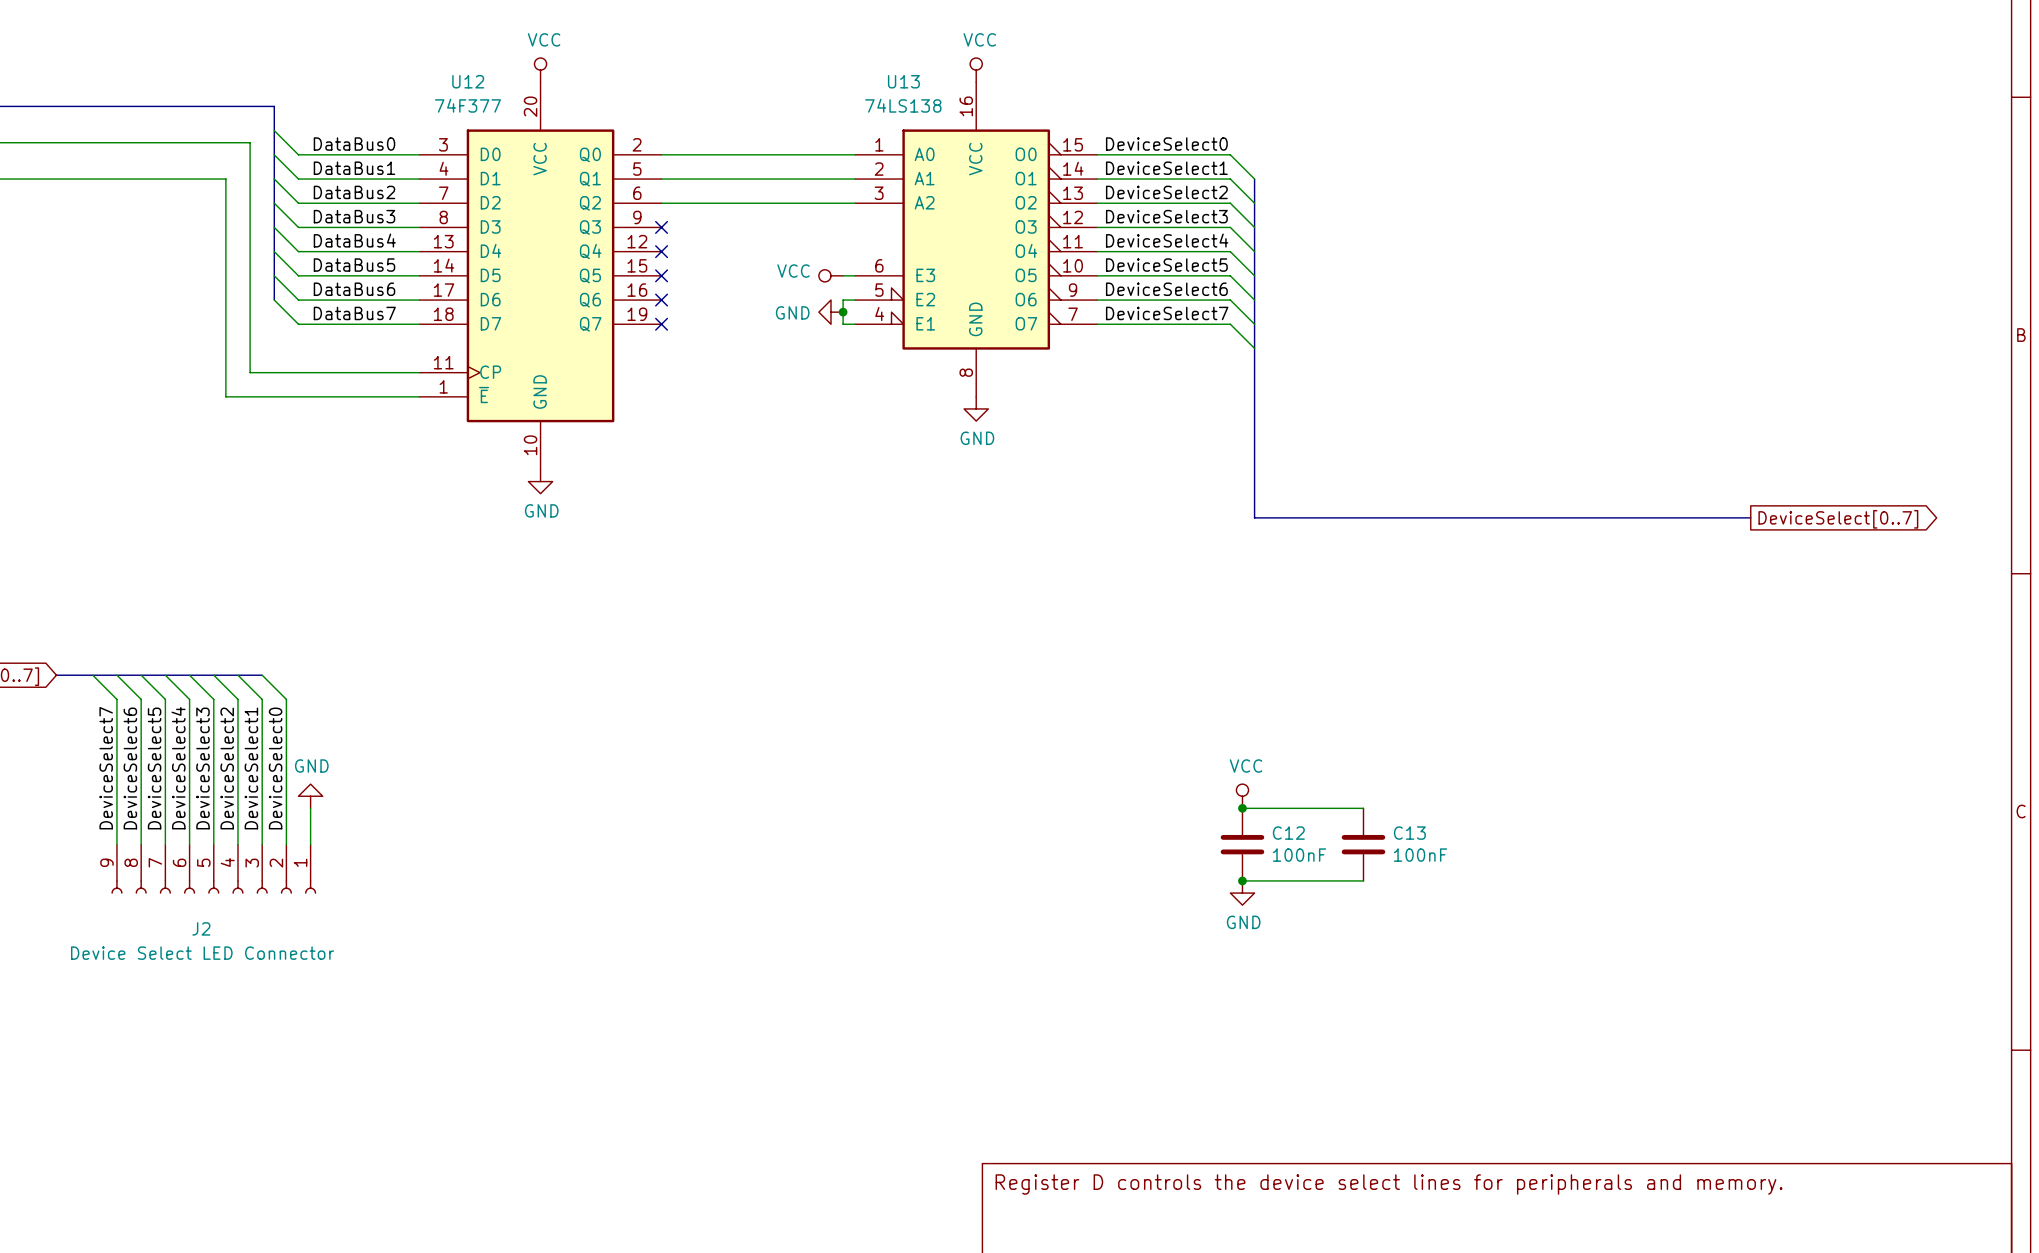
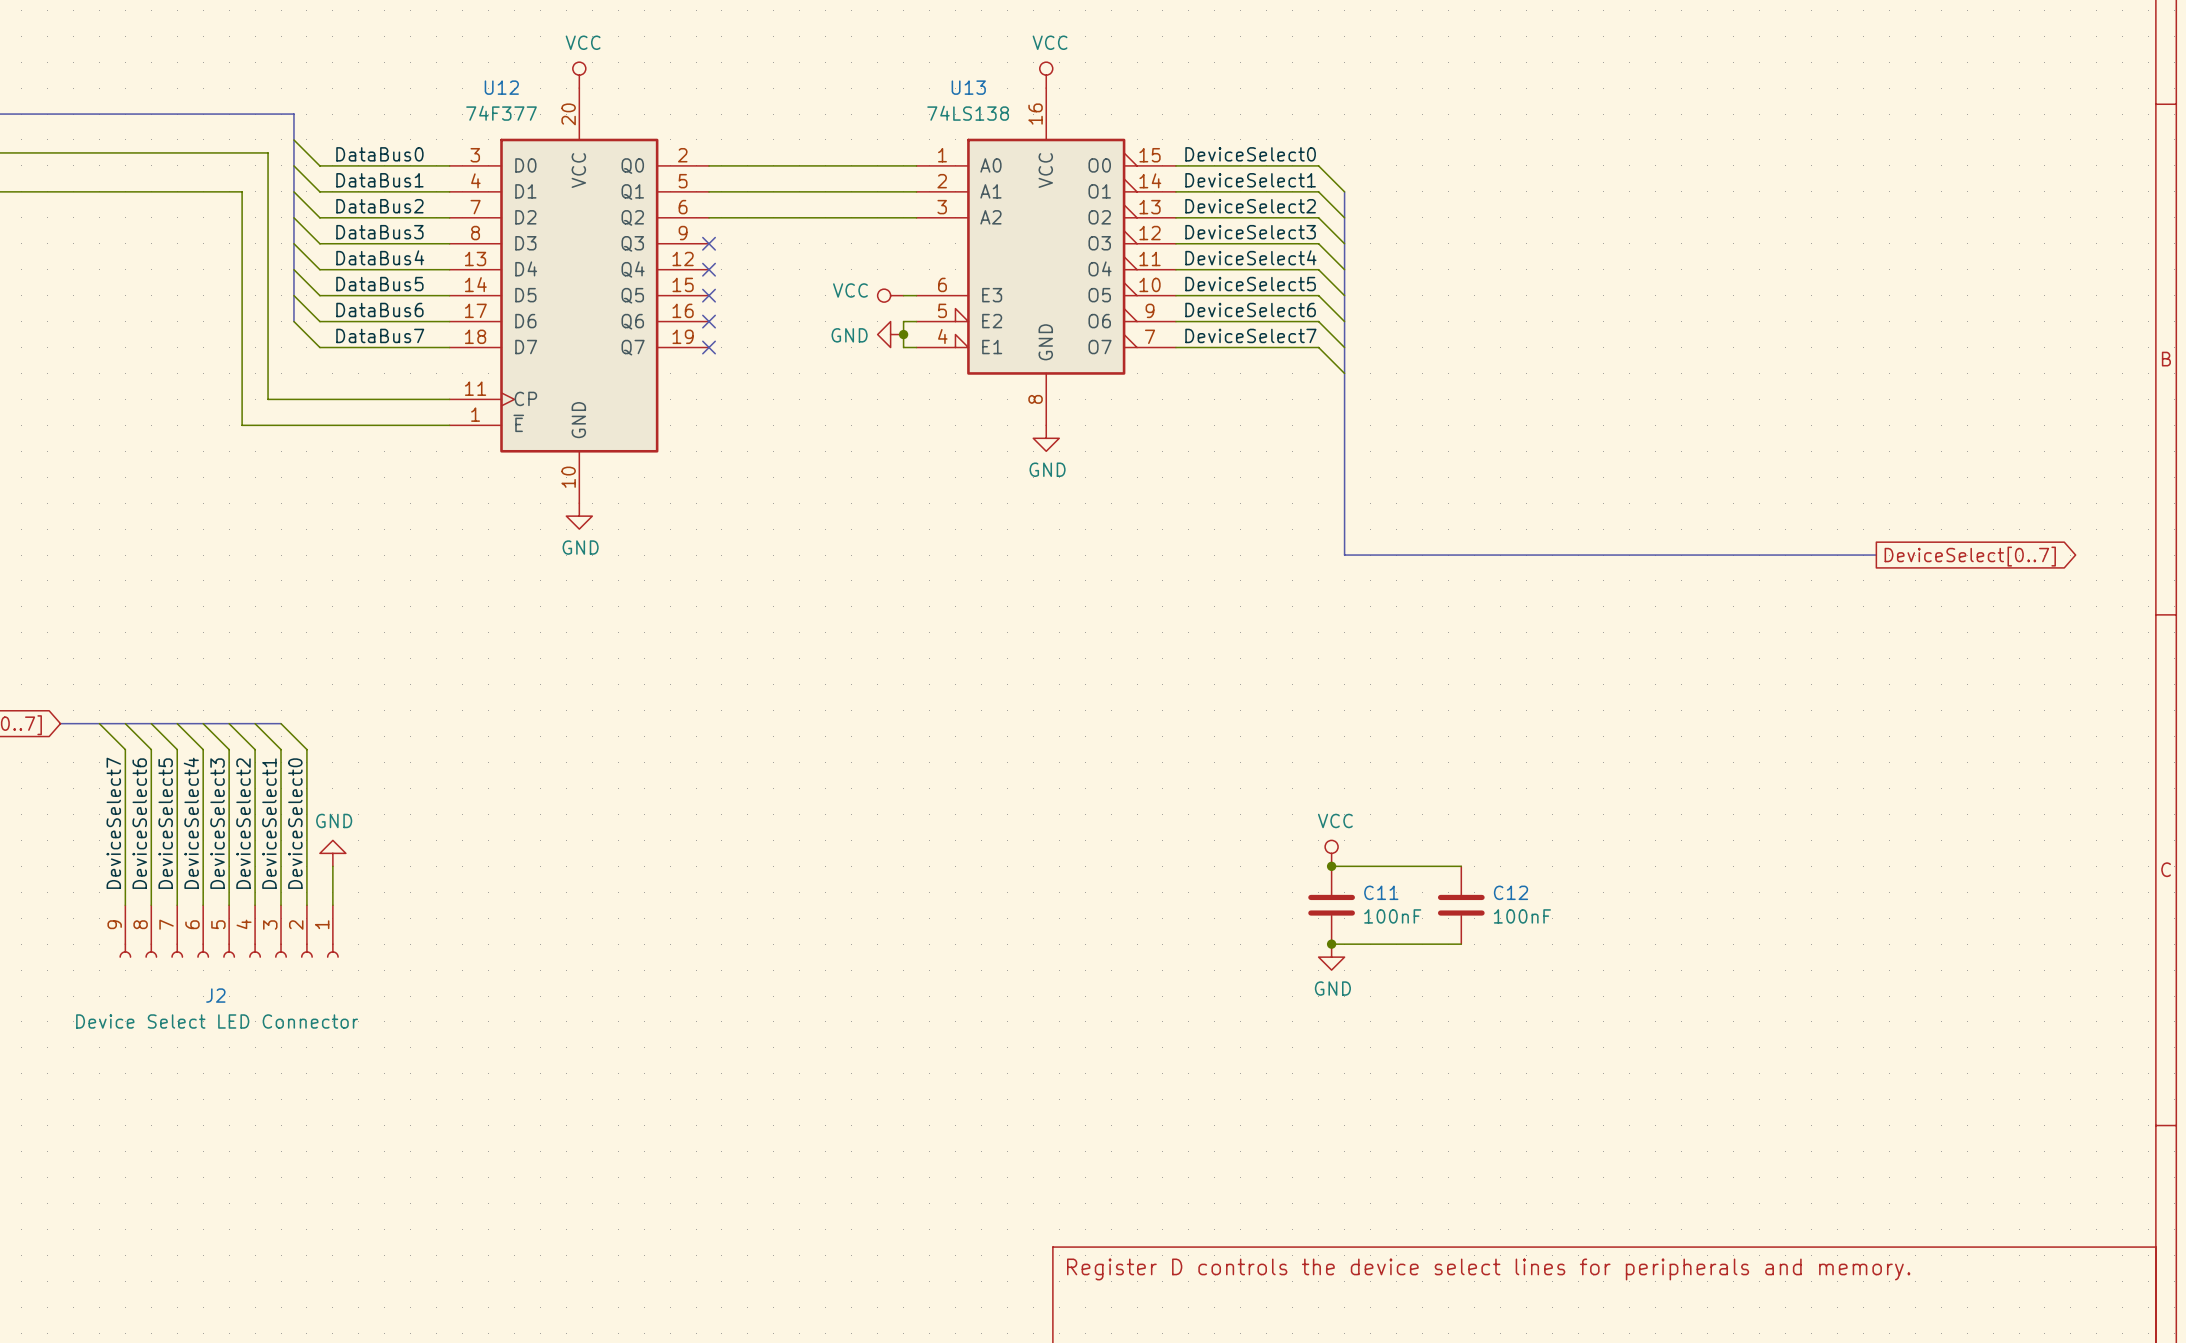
C12 name: C12 (1288, 833) -> C11 (1381, 892)
C13 name: C13 (1409, 833) -> C12 (1511, 892)

